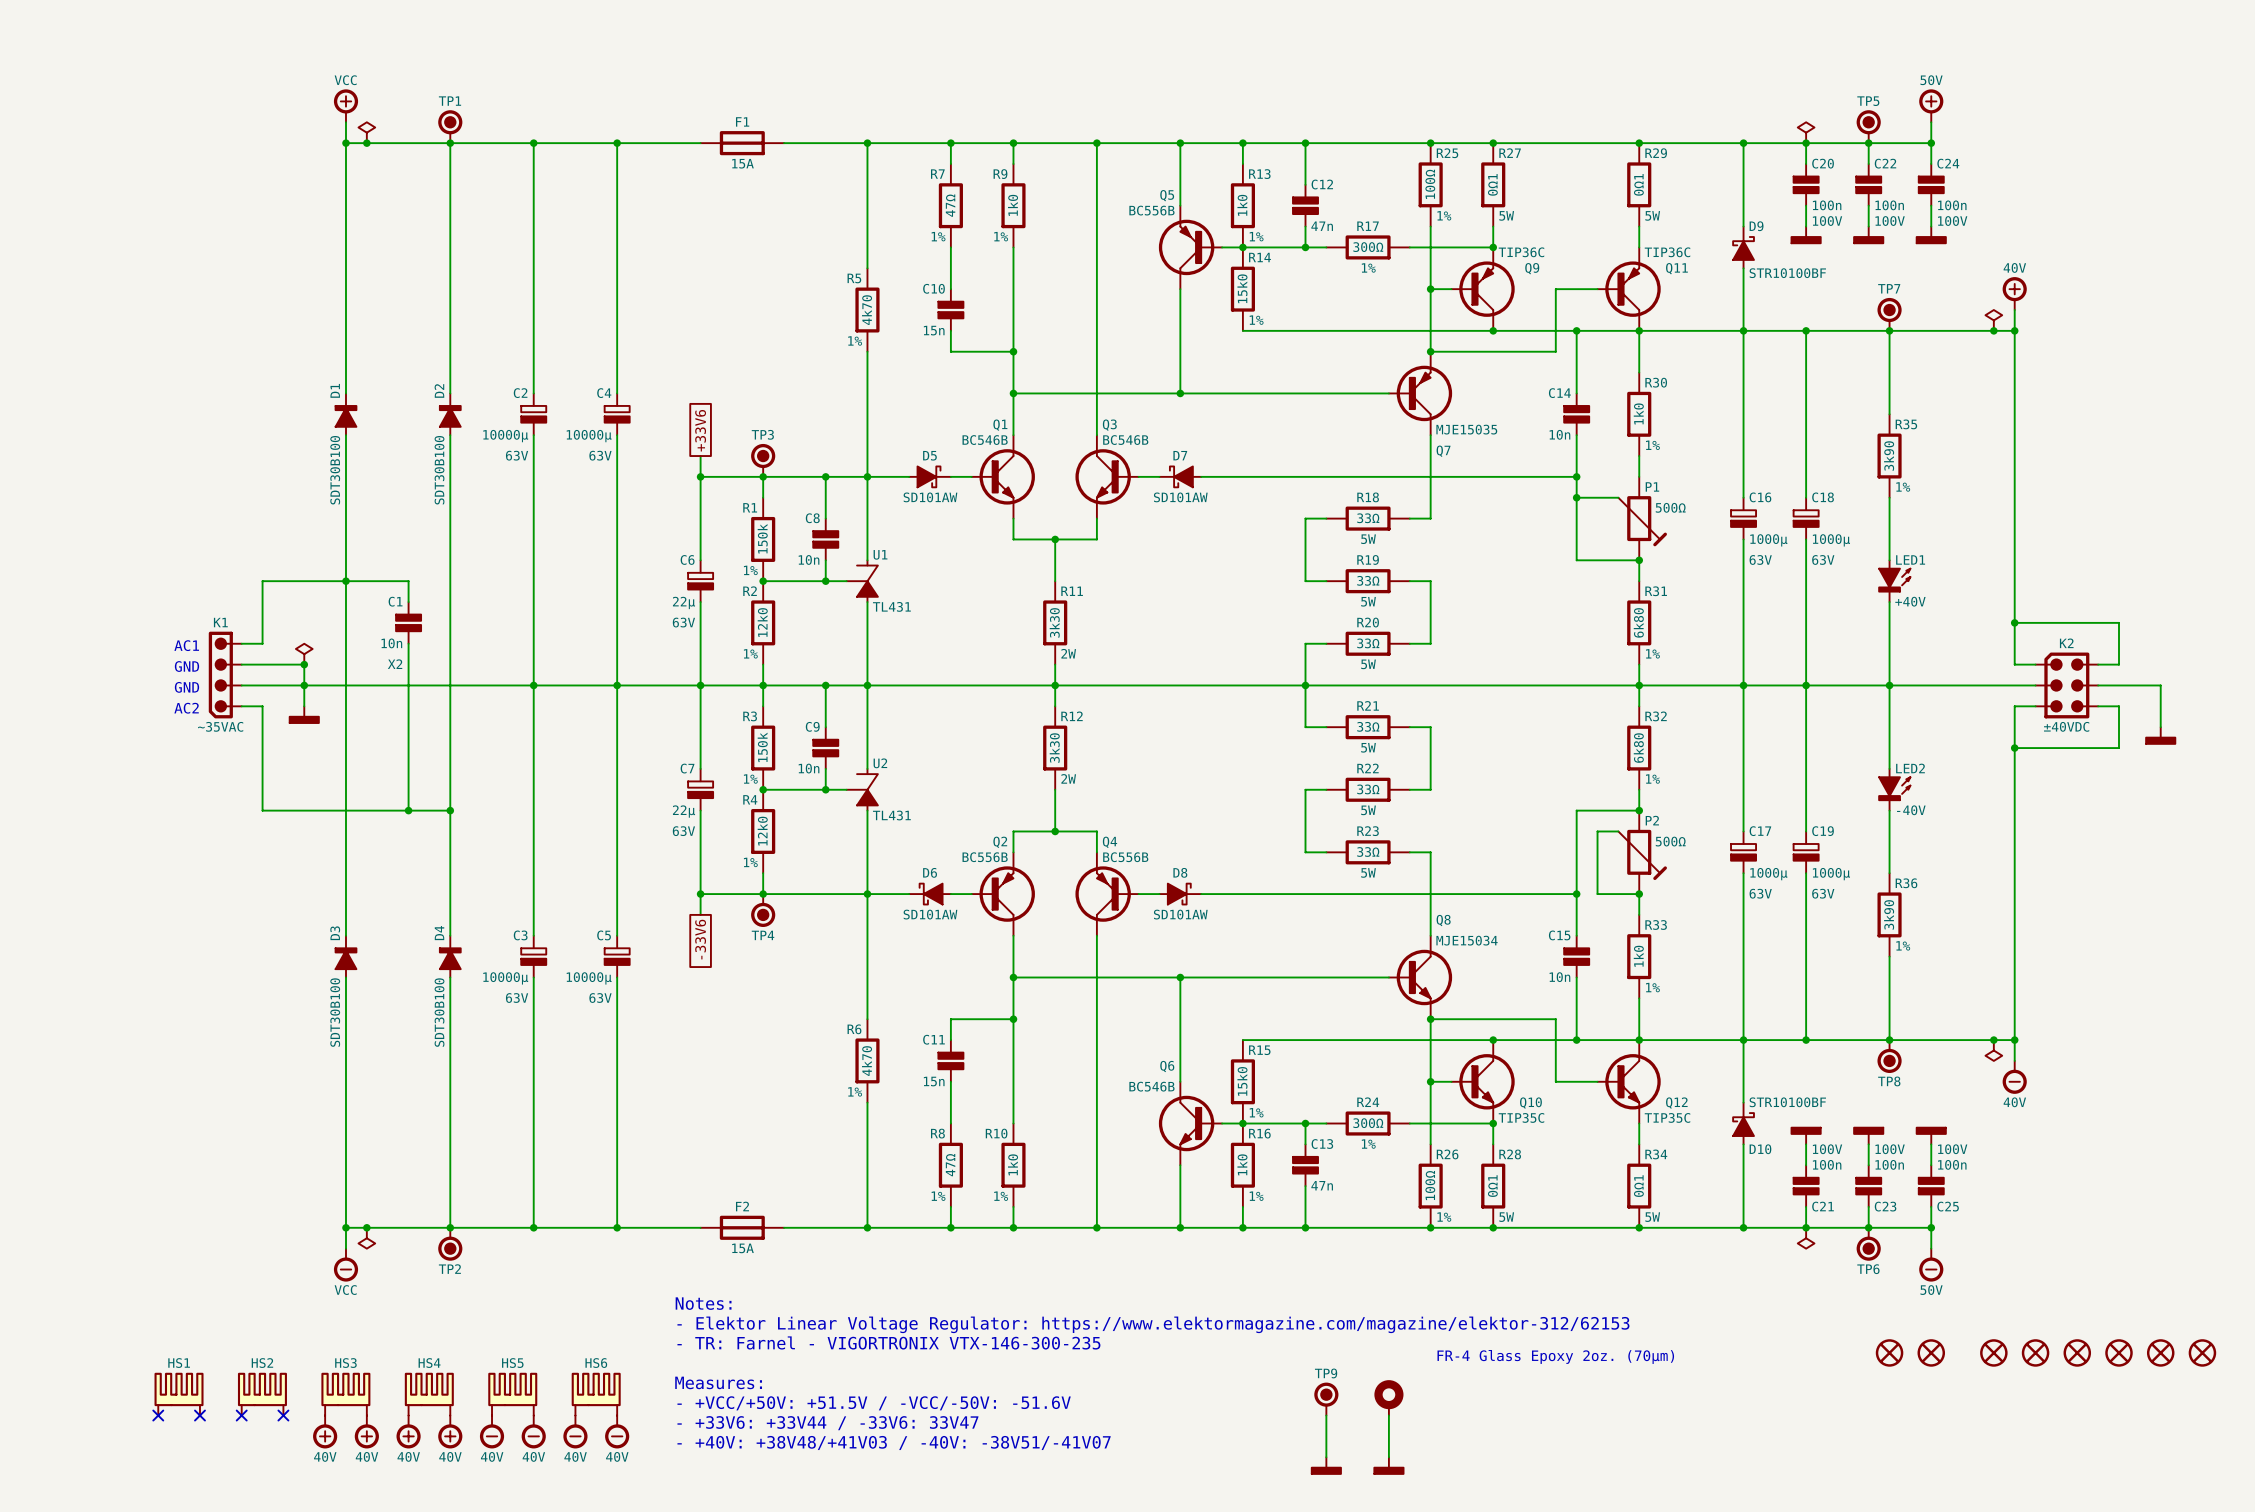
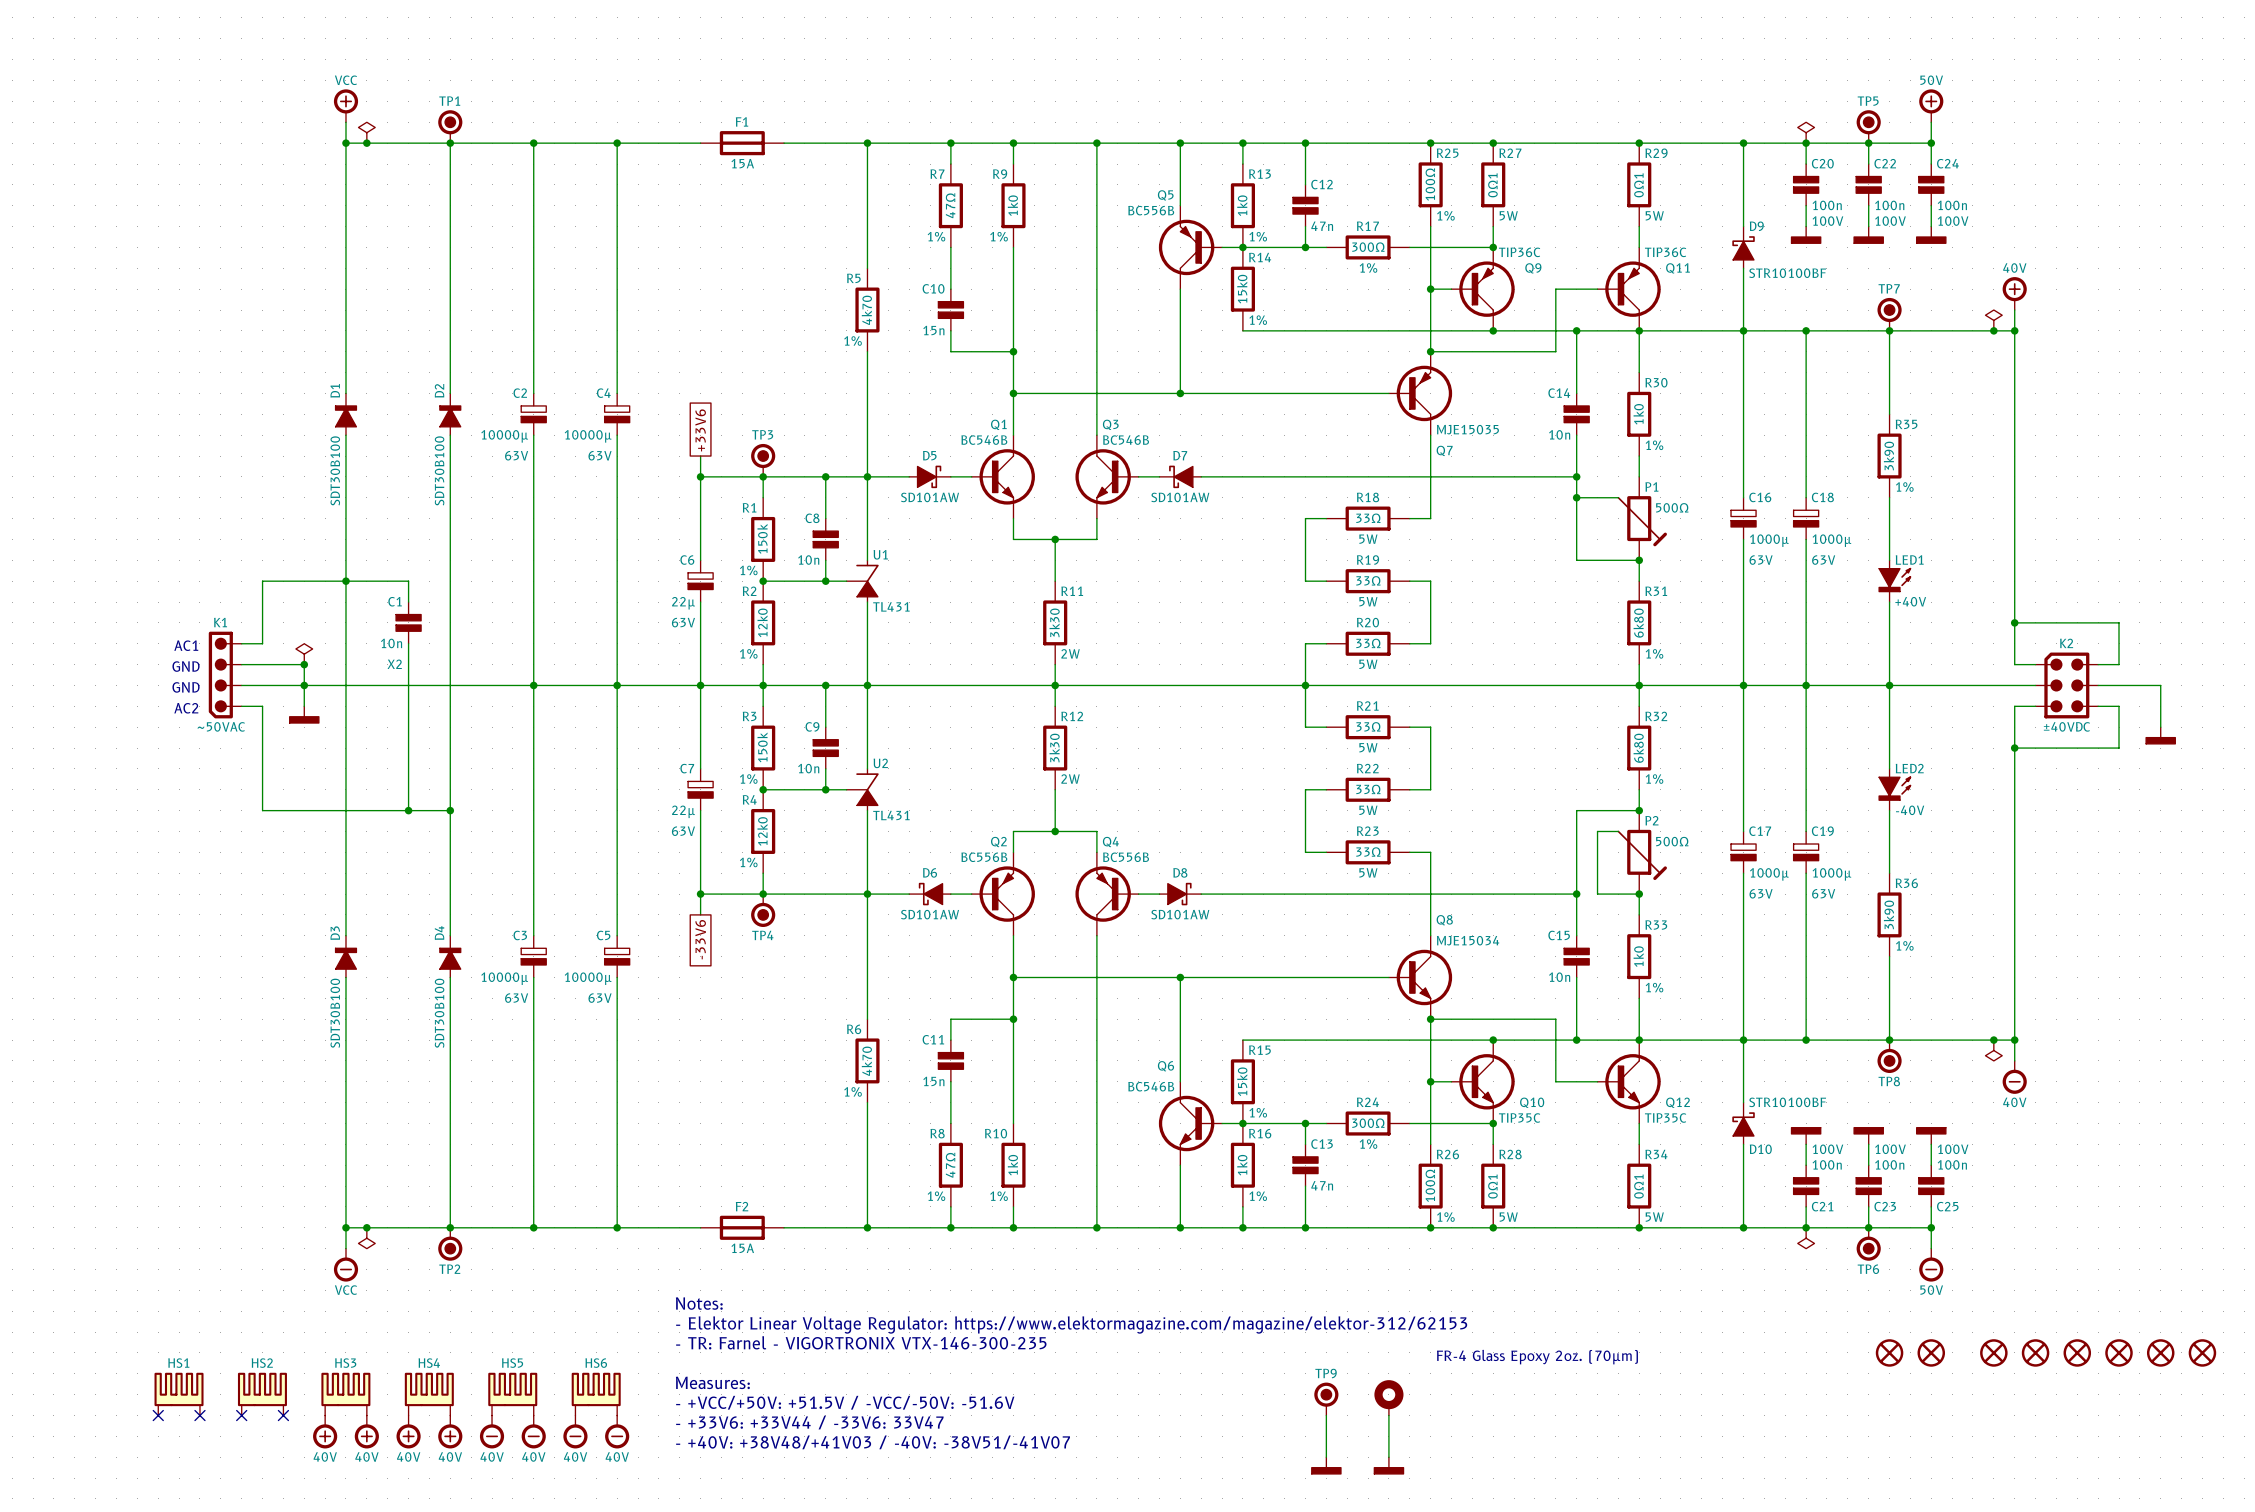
K1 value: ~35VAC (220, 726) -> ~50VAC (221, 726)

